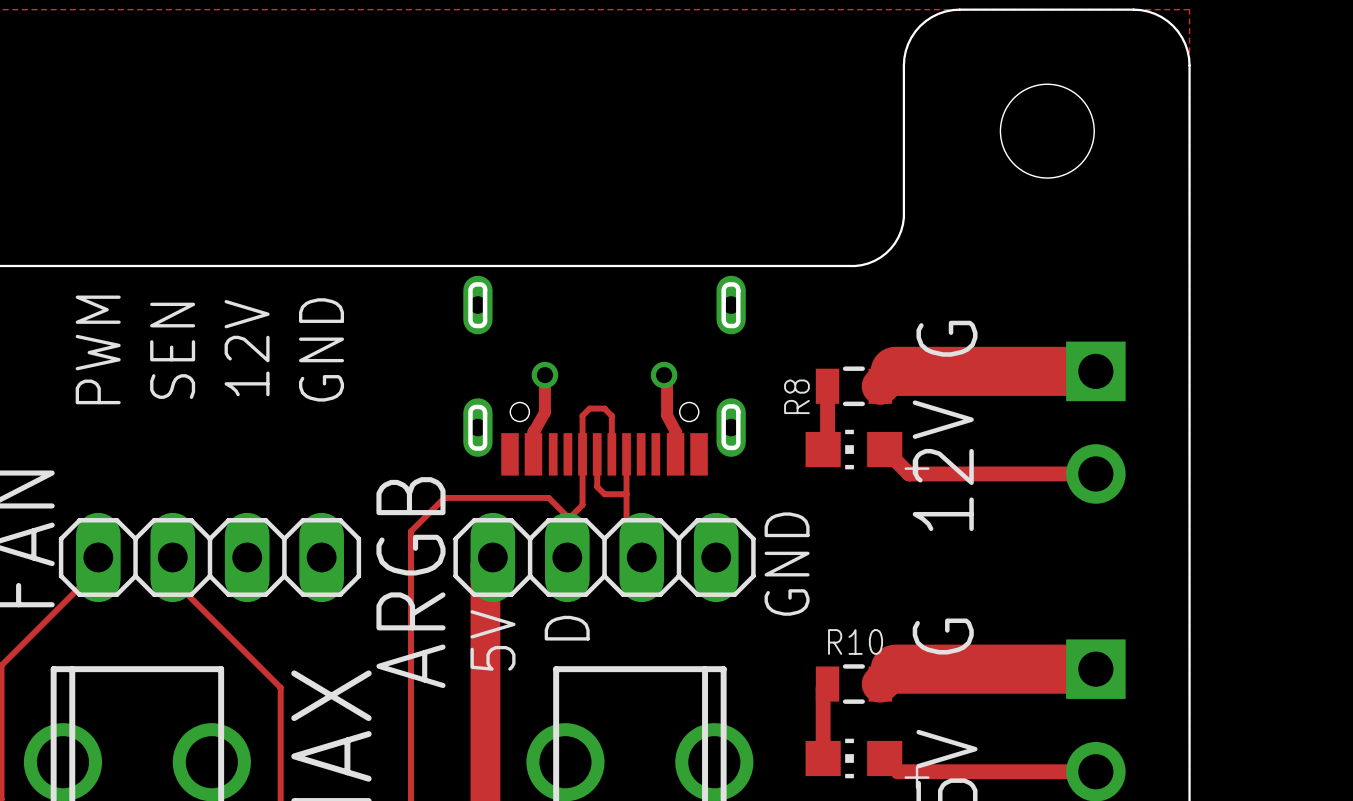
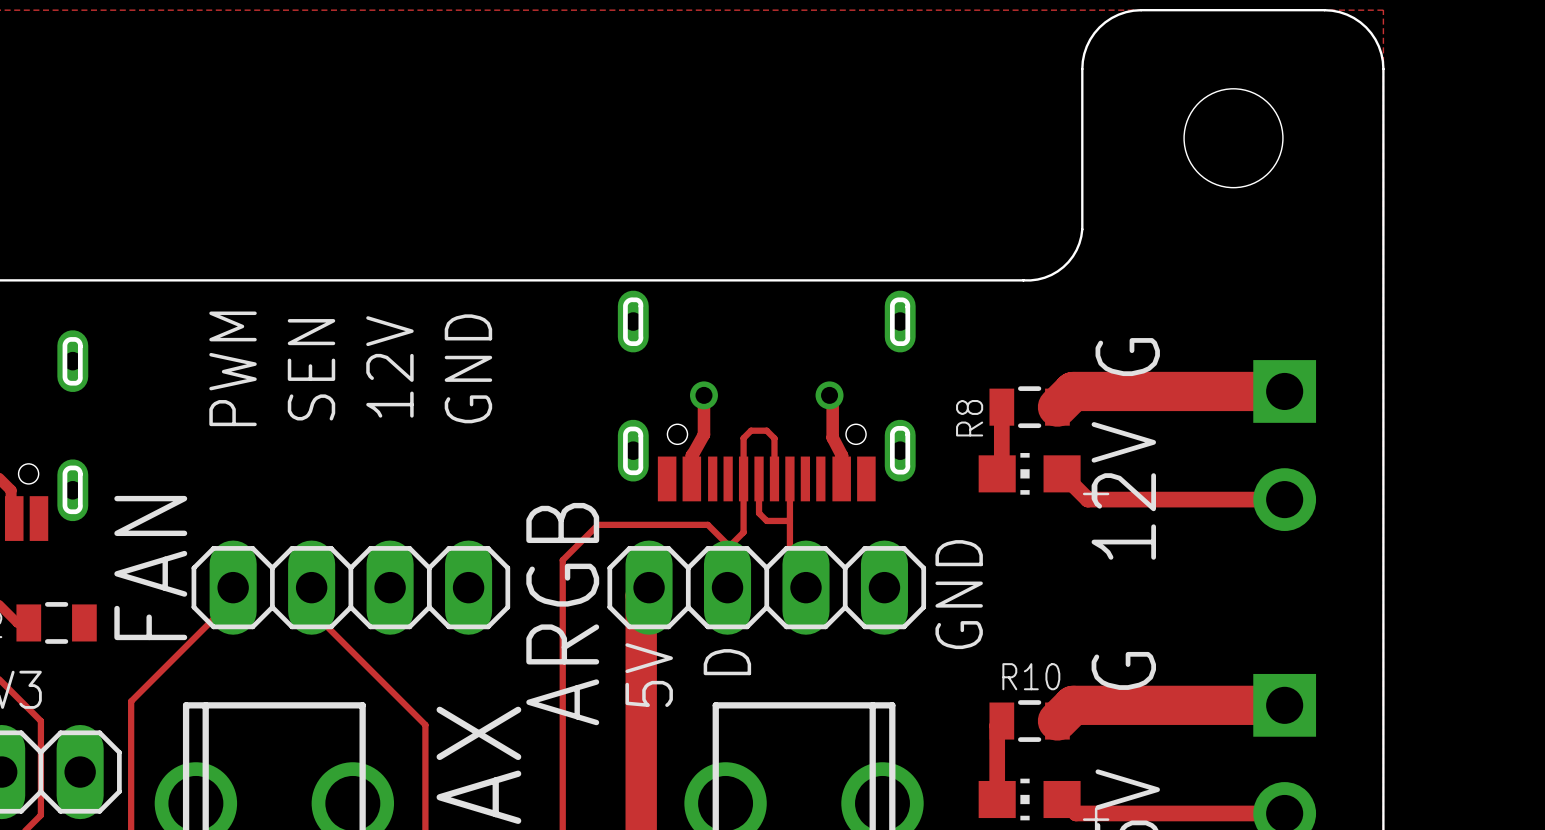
track width: thick (895, 371) (1095, 371) -> thin (1073, 391) (1284, 391)
track width: thick (895, 669) (1095, 669) -> thin (1073, 705) (1284, 705)

